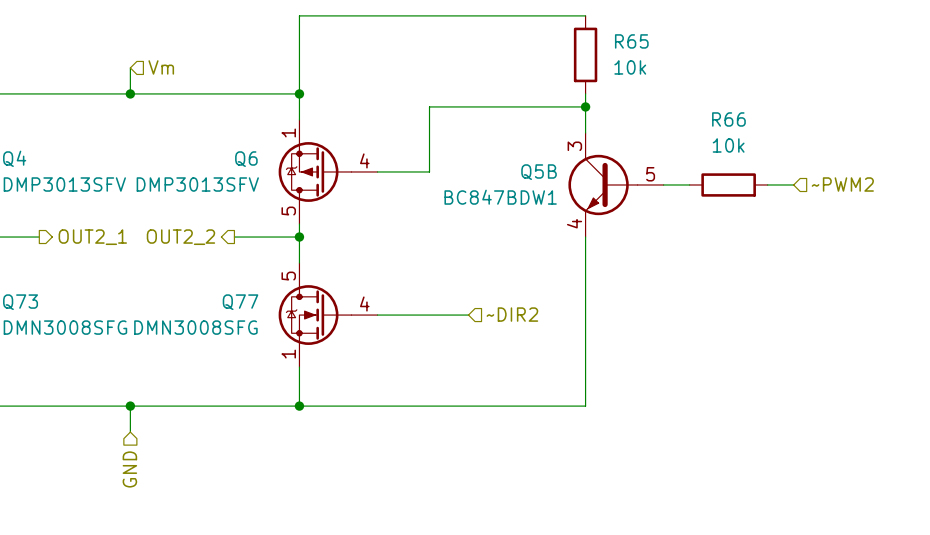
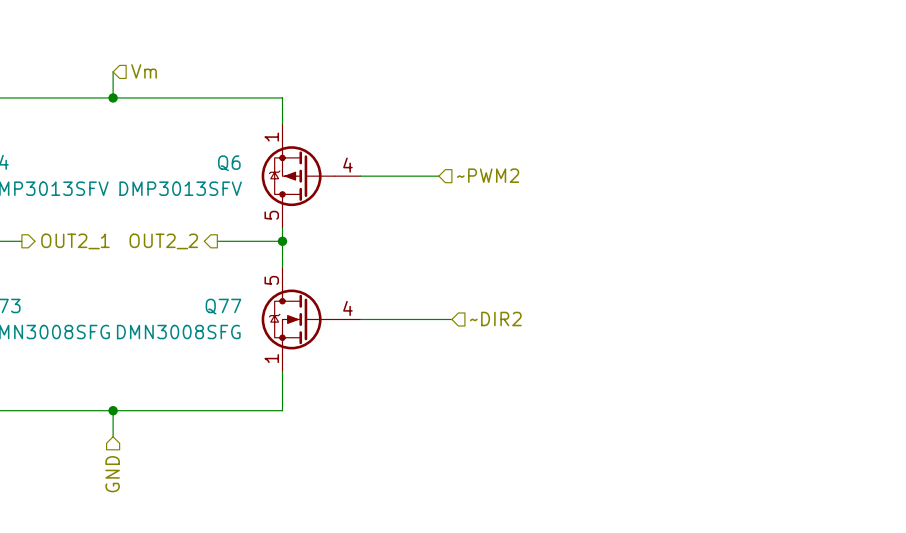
wire: (585, 15) (299, 15) (299, 93) -> none
R65: 10k (585, 54) -> none
junction: (299, 93) -> none
wire: (585, 93) (585, 132) -> none
wire: (585, 106) (429, 106) (429, 171) -> (438, 176) (412, 176)
junction: (585, 106) -> none
hierarchical label: none -> ~PWM2 (488, 175)
Q5B: BC847BDW1 (616, 184) -> none
wire: (663, 184) (689, 184) -> none
R66: 10k (728, 184) -> none
wire: (767, 184) (793, 184) -> none
hierarchical label: ~PWM2 (842, 184) -> none
wire: (585, 237) (585, 406) (299, 406) -> none
junction: (299, 406) -> none

